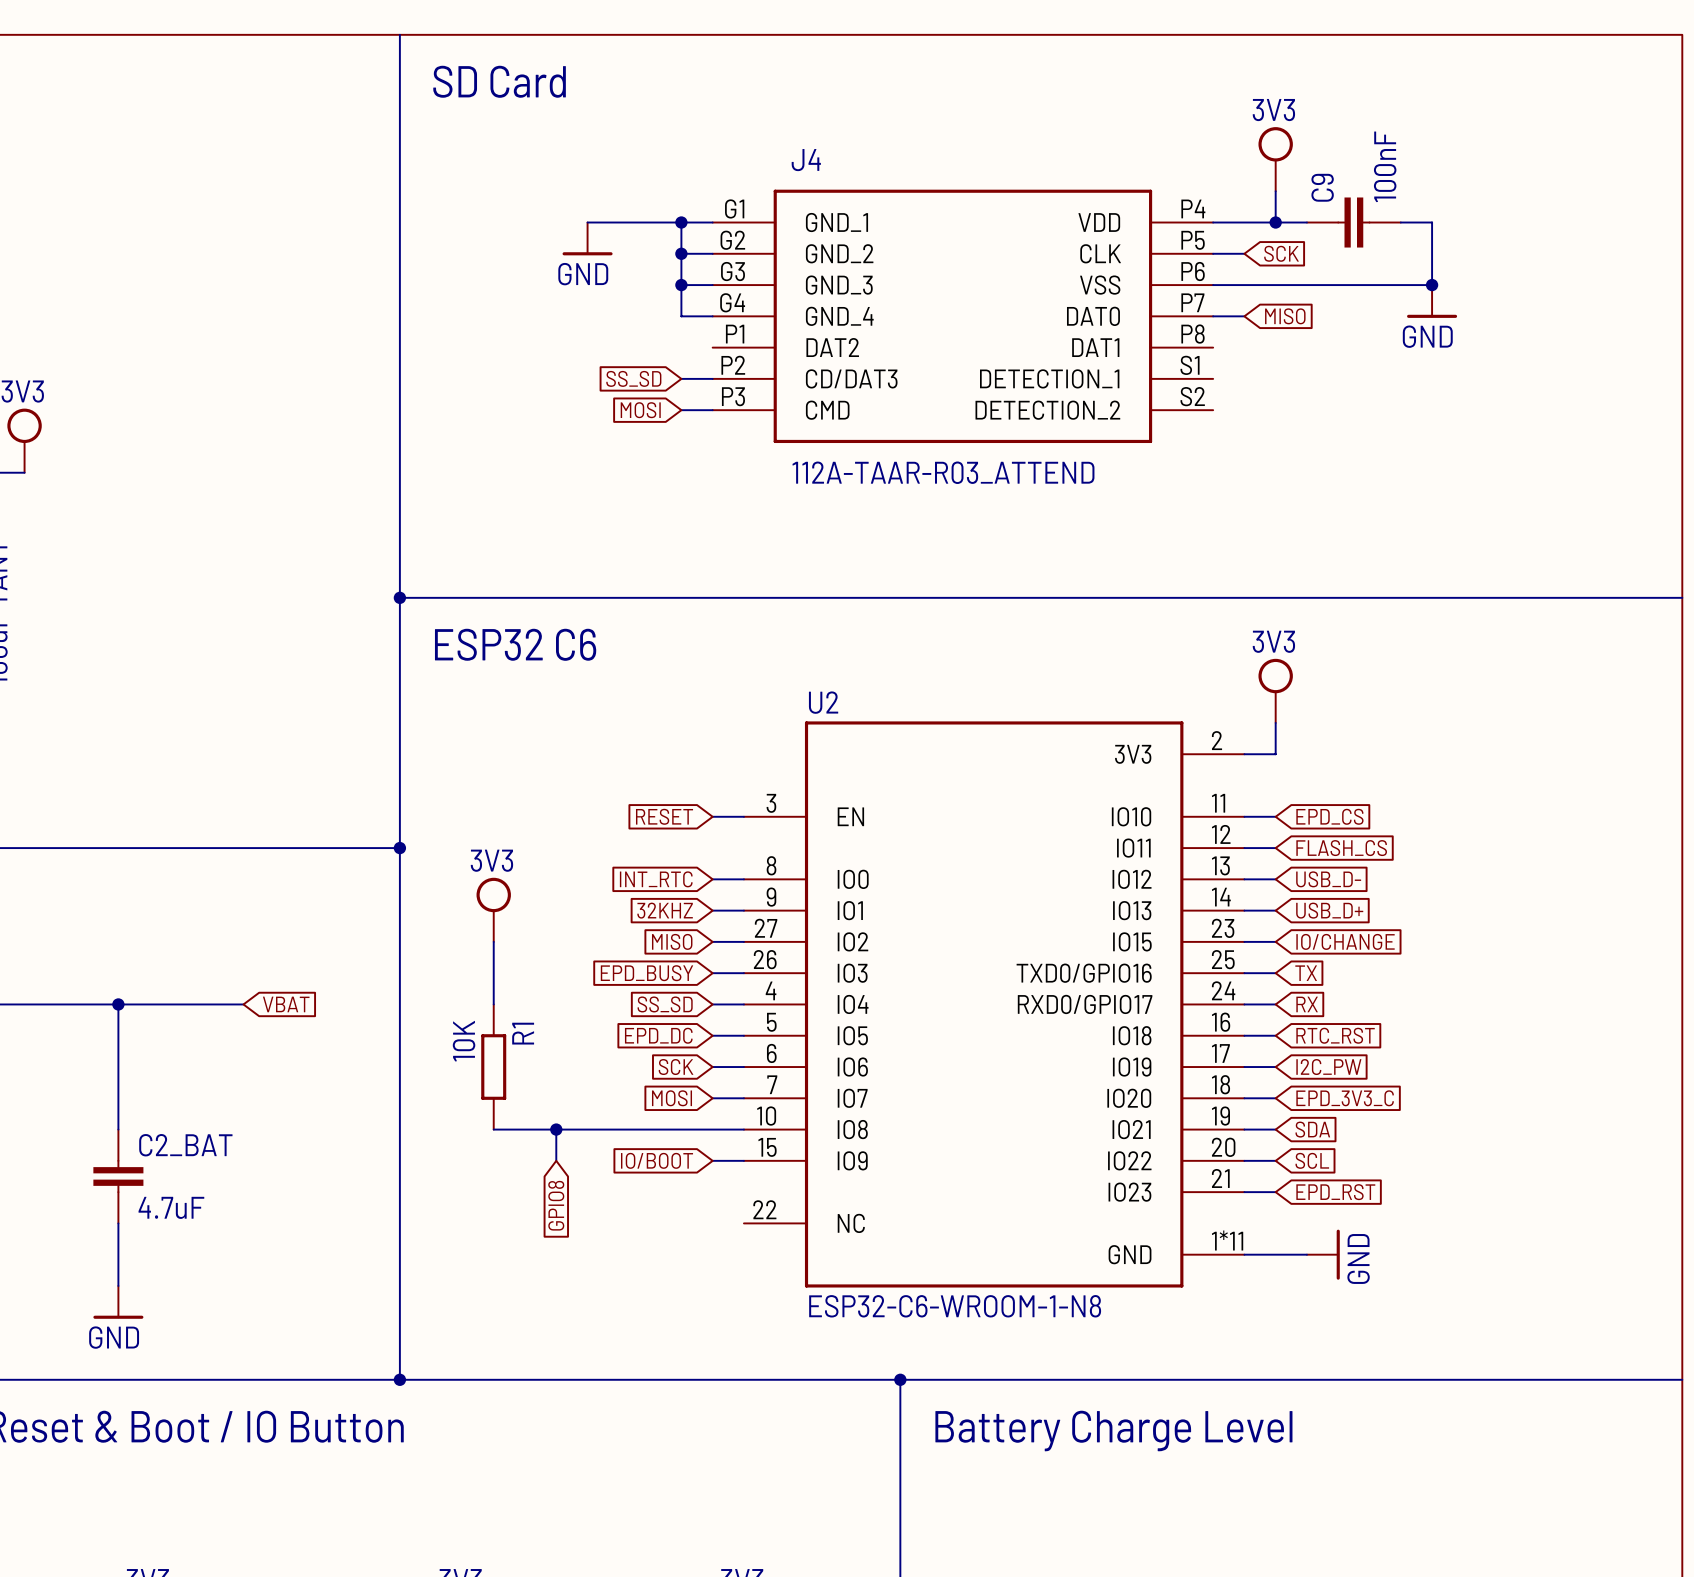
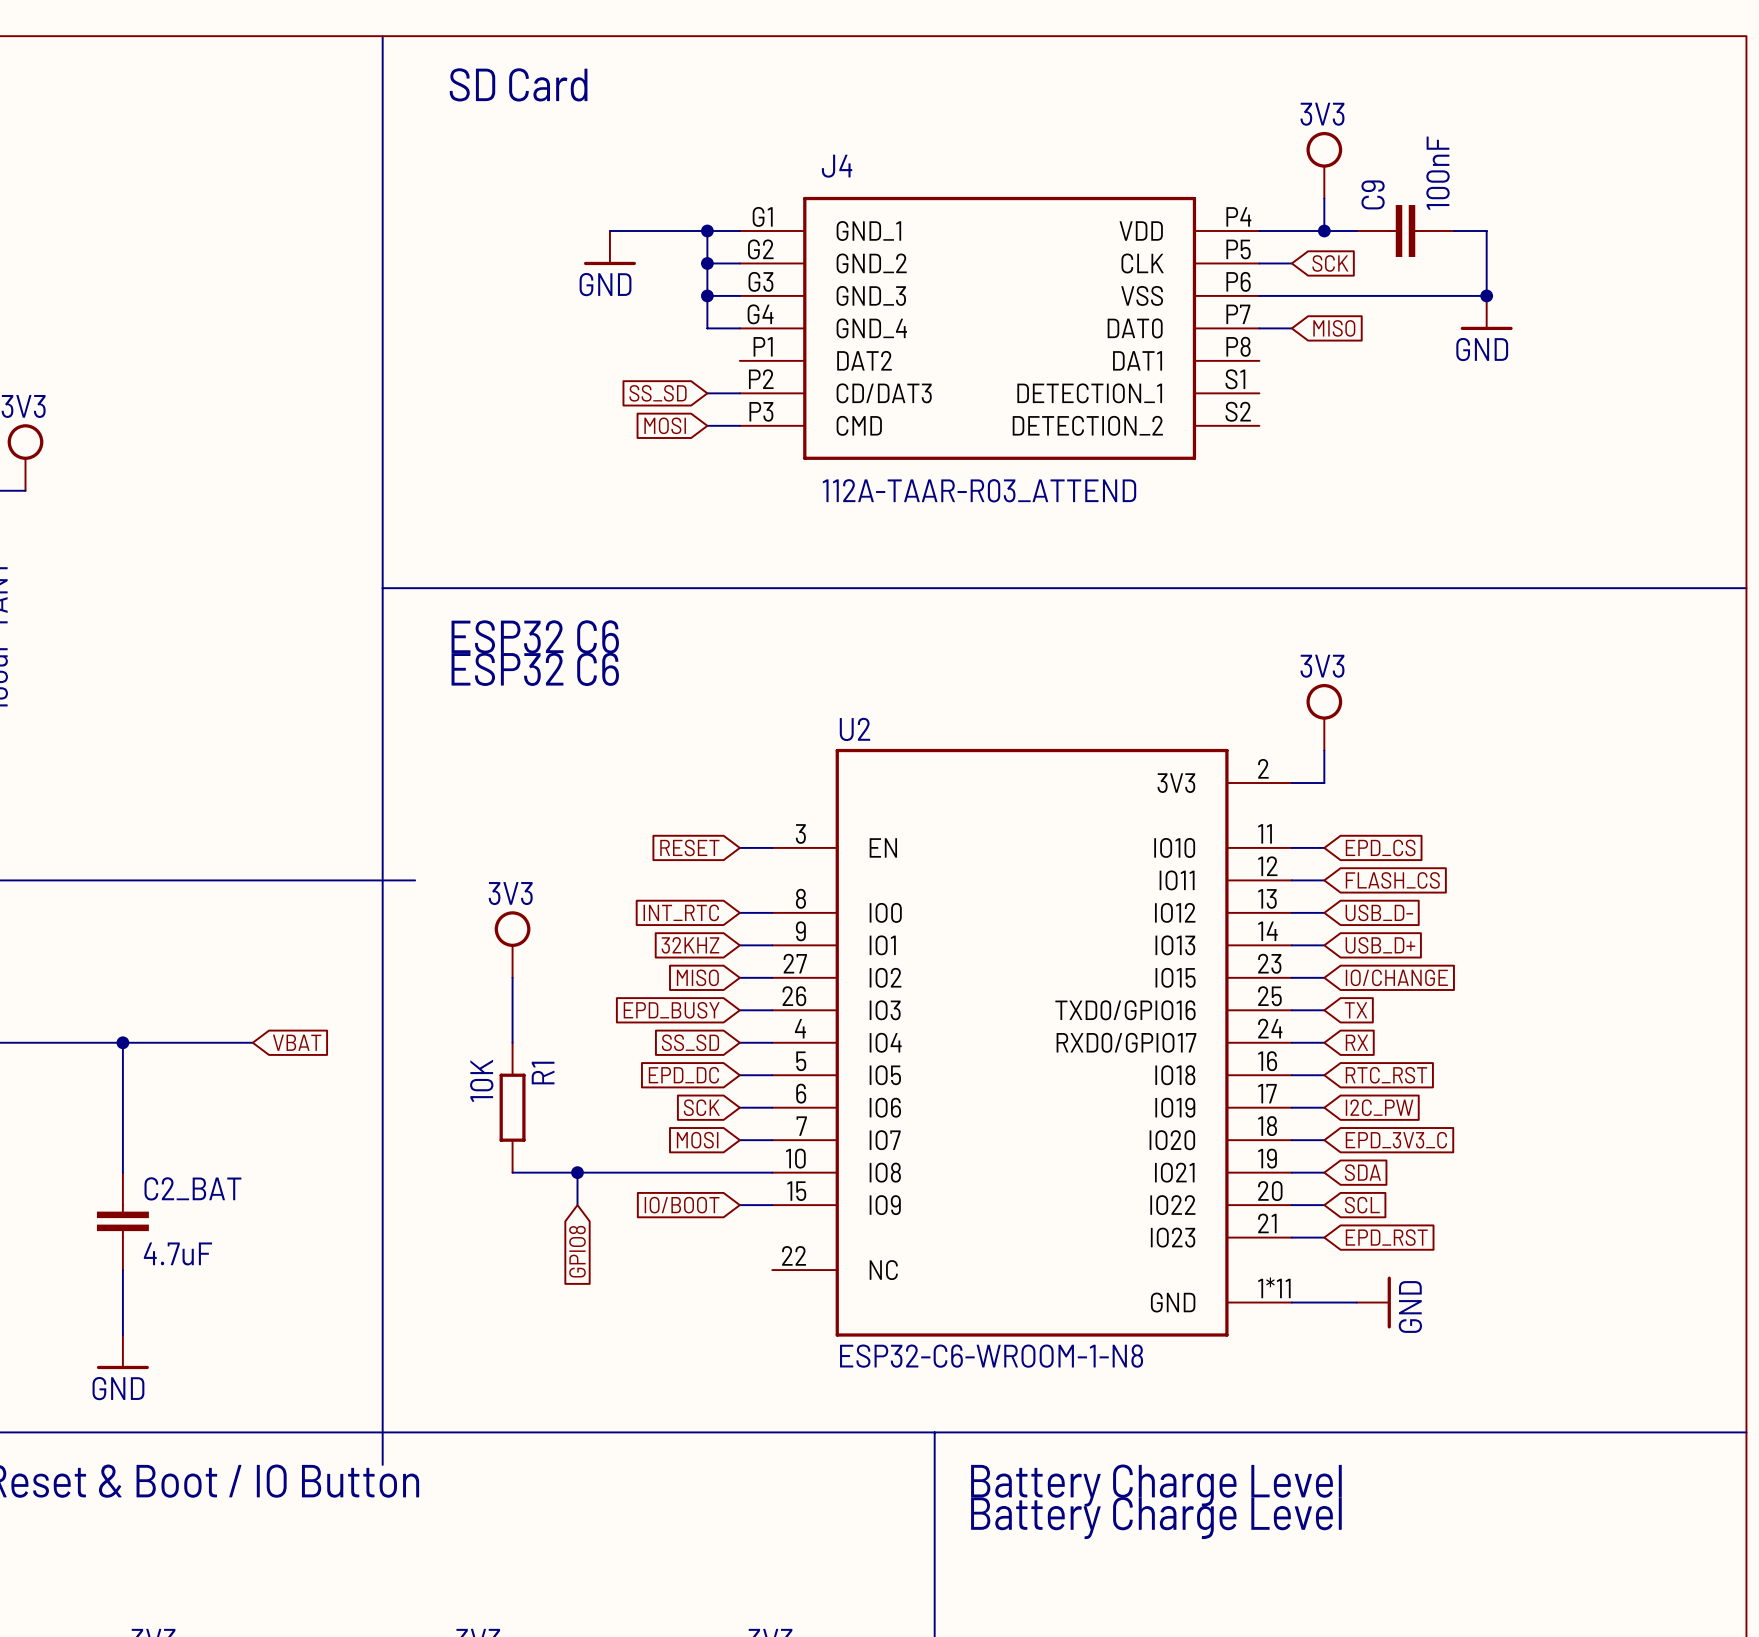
line: none -> (382, 36) (382, 1464)
wire: (399, 34) (399, 1379) -> none
line: none -> (382, 588) (1746, 588)
wire: (399, 597) (1682, 597) -> none
junction: (399, 597) -> none
text: none -> ESP32 C6 (535, 636)
junction: (399, 848) -> none
junction: (399, 1379) -> none
junction: (900, 1379) -> none
text: none -> Battery Charge Level (1156, 1518)

